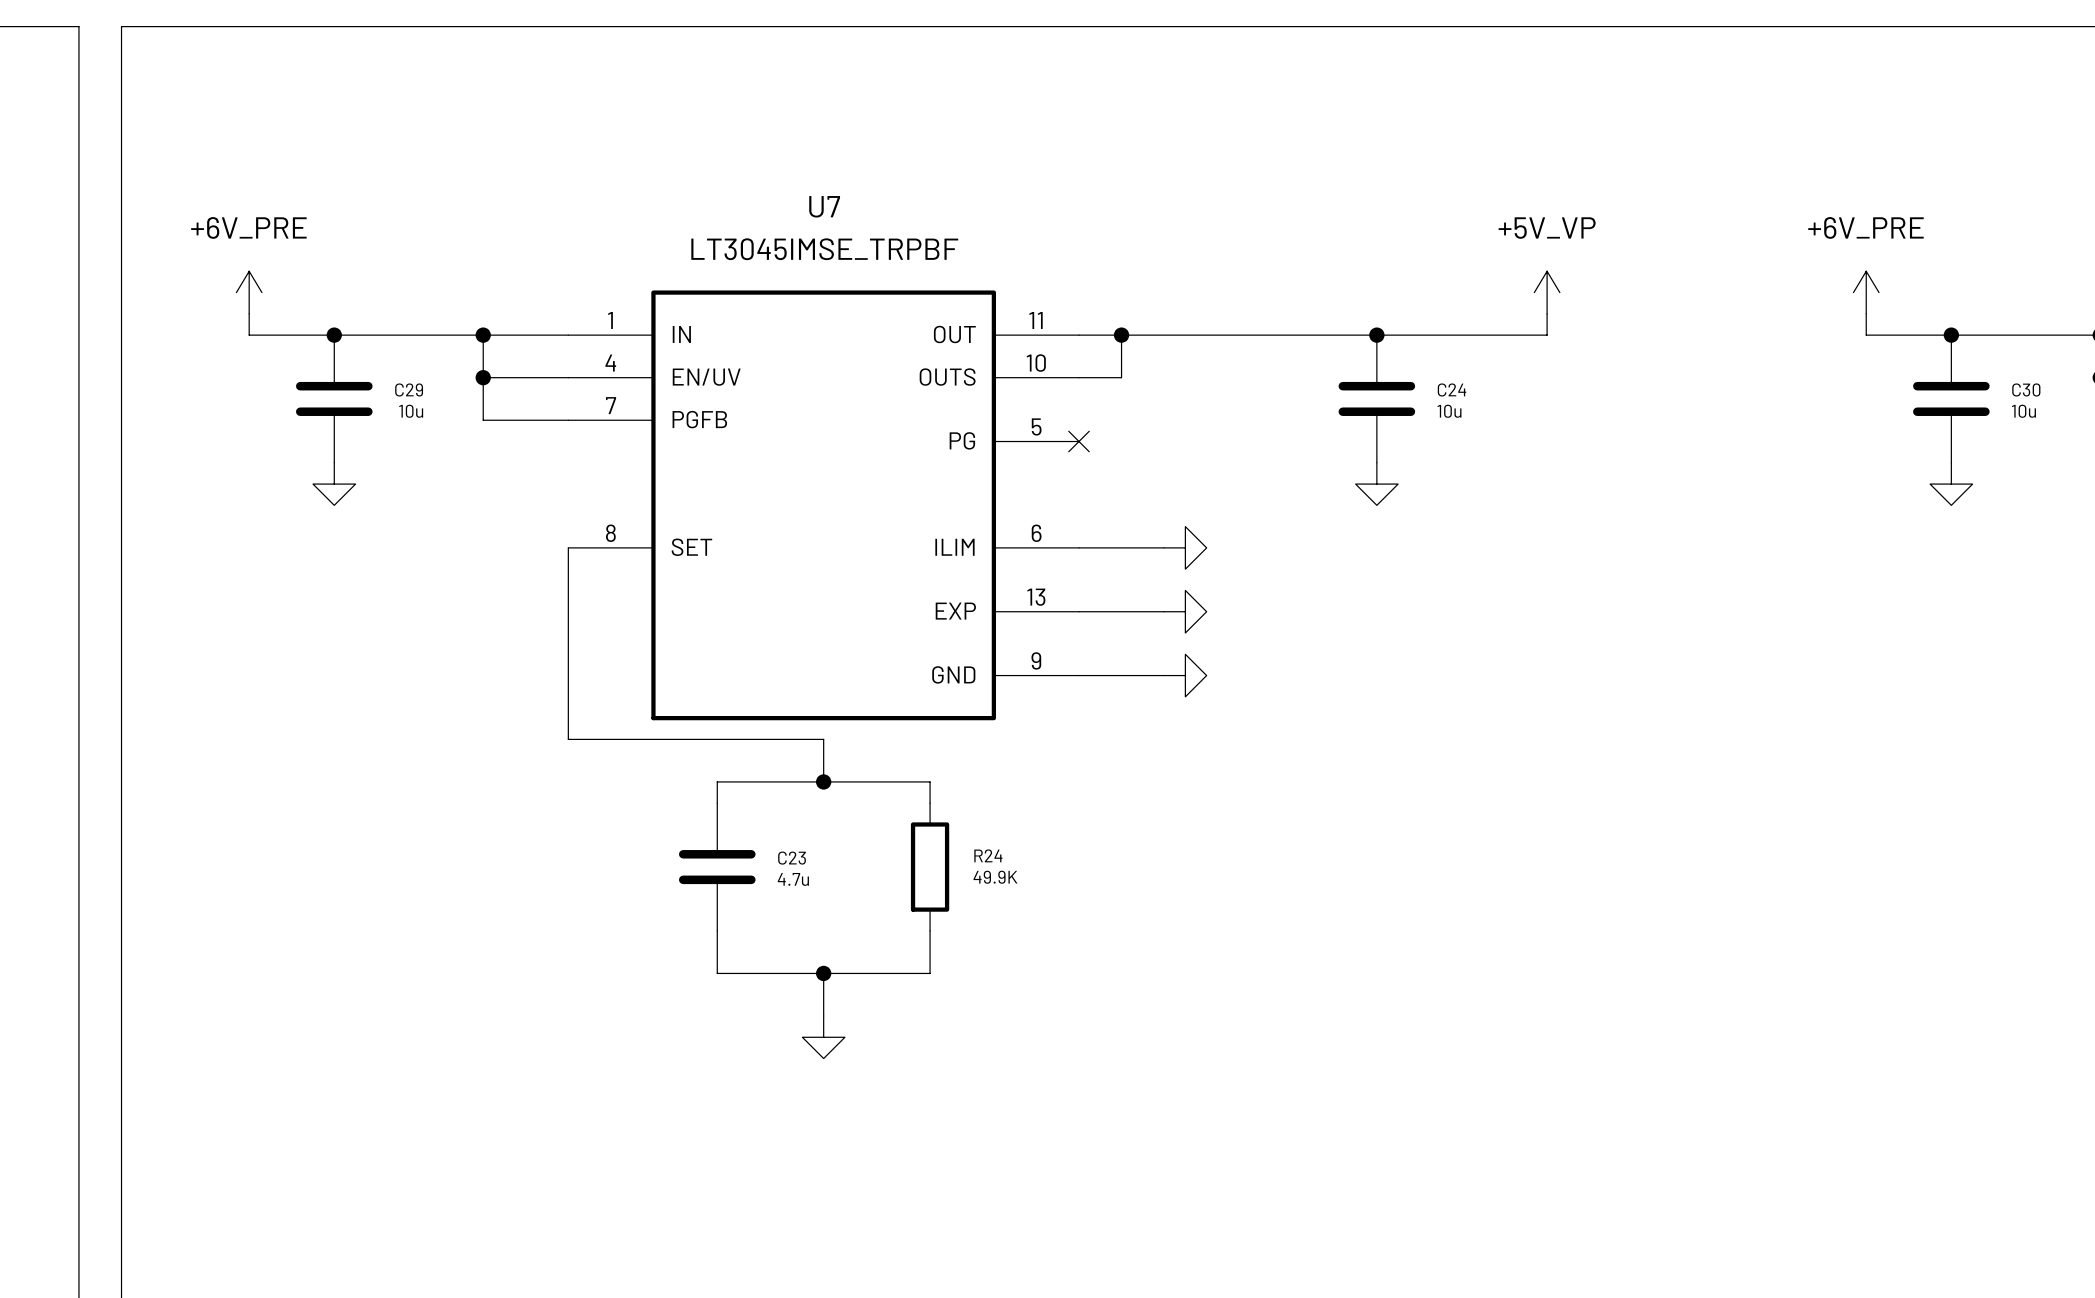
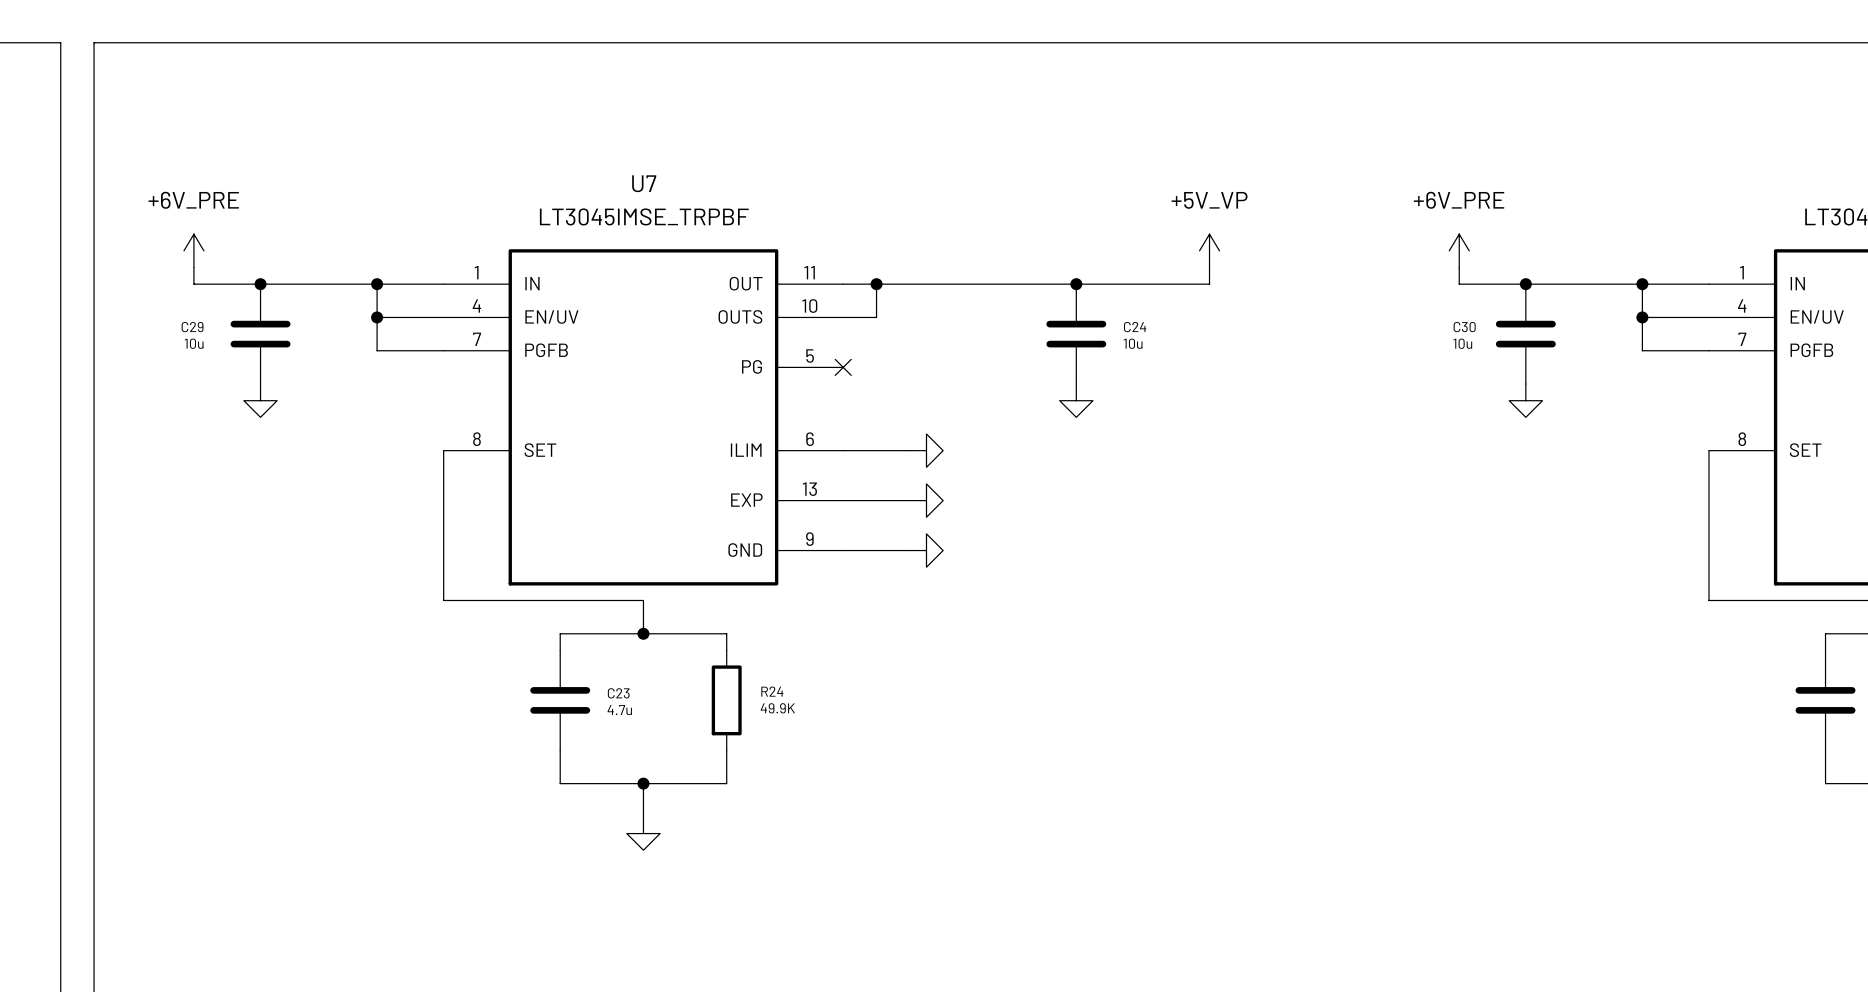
C29 name position: C29 (409, 389) -> C29 (192, 327)
C30 name position: C30 (2026, 389) -> C30 (1464, 327)
C29 value position: 10u (411, 411) -> 10u (194, 343)
C30 value position: 10u (2023, 411) -> 10u (1462, 343)

